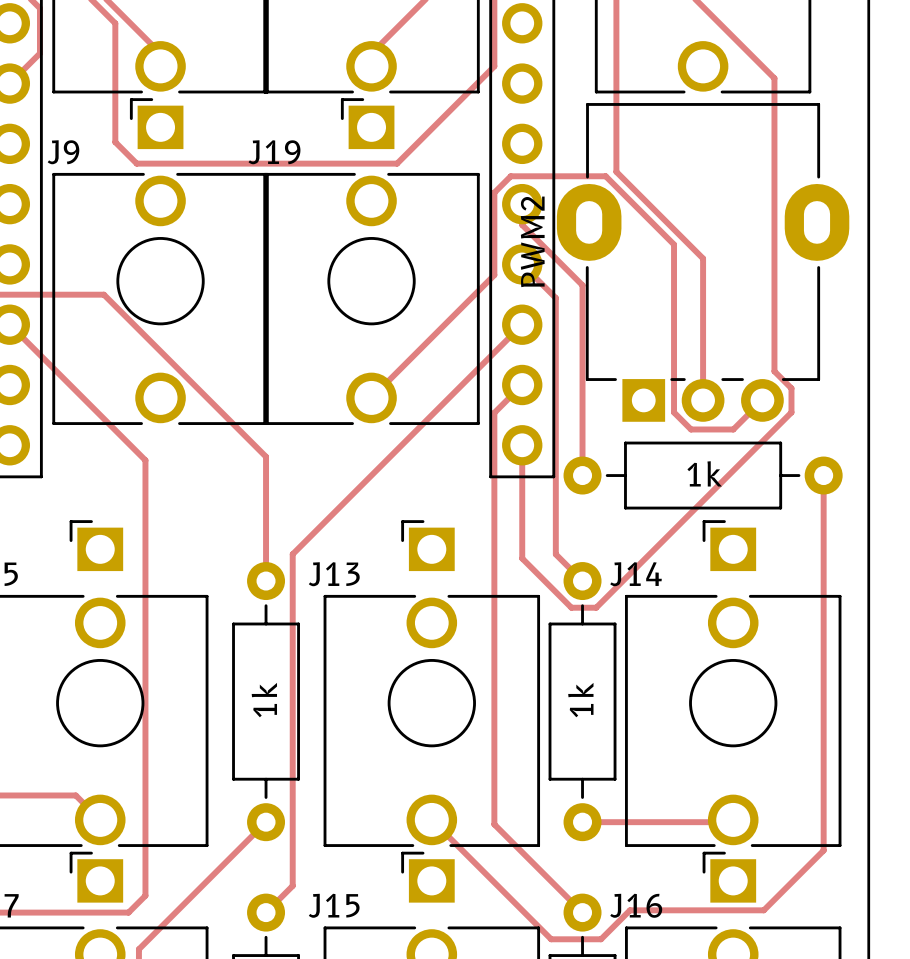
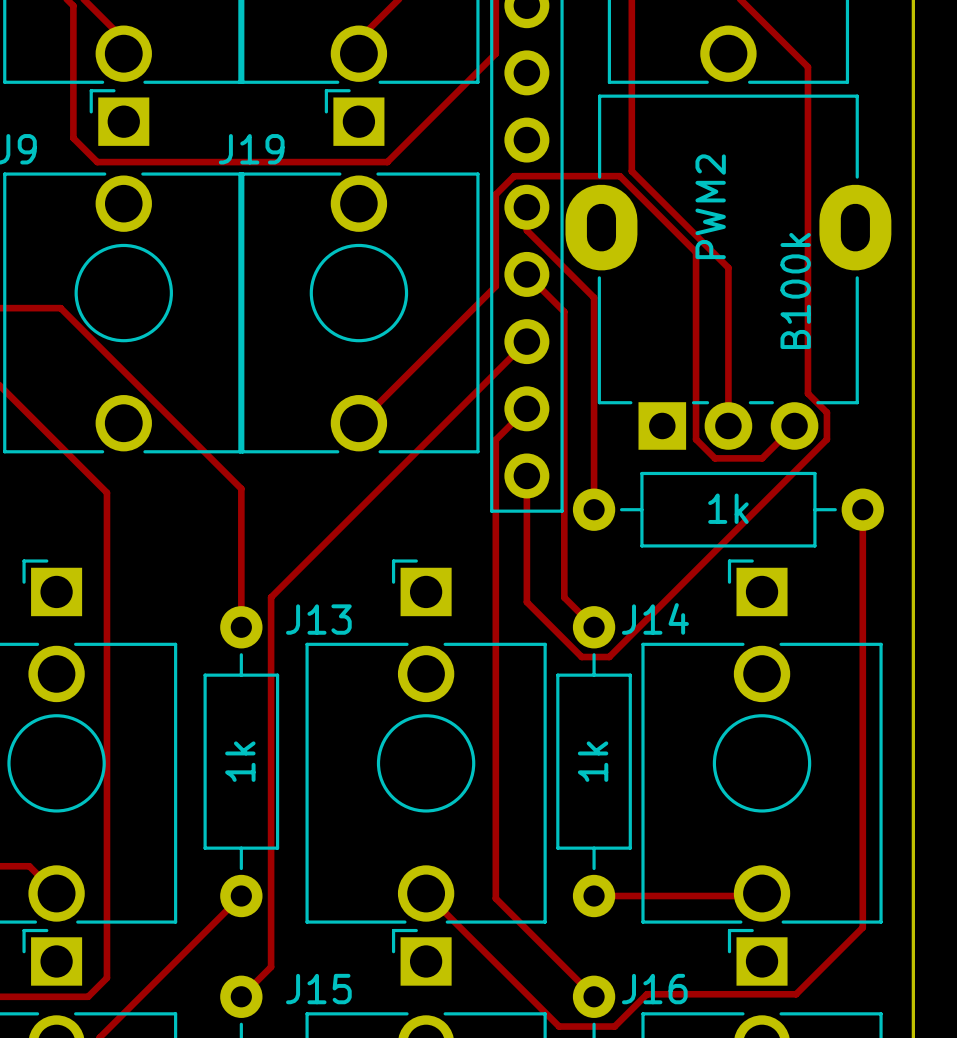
PWM2 name position: PWM2 (532, 241) -> PWM2 (710, 206)
PWM2 value: none -> B100k (795, 290)

